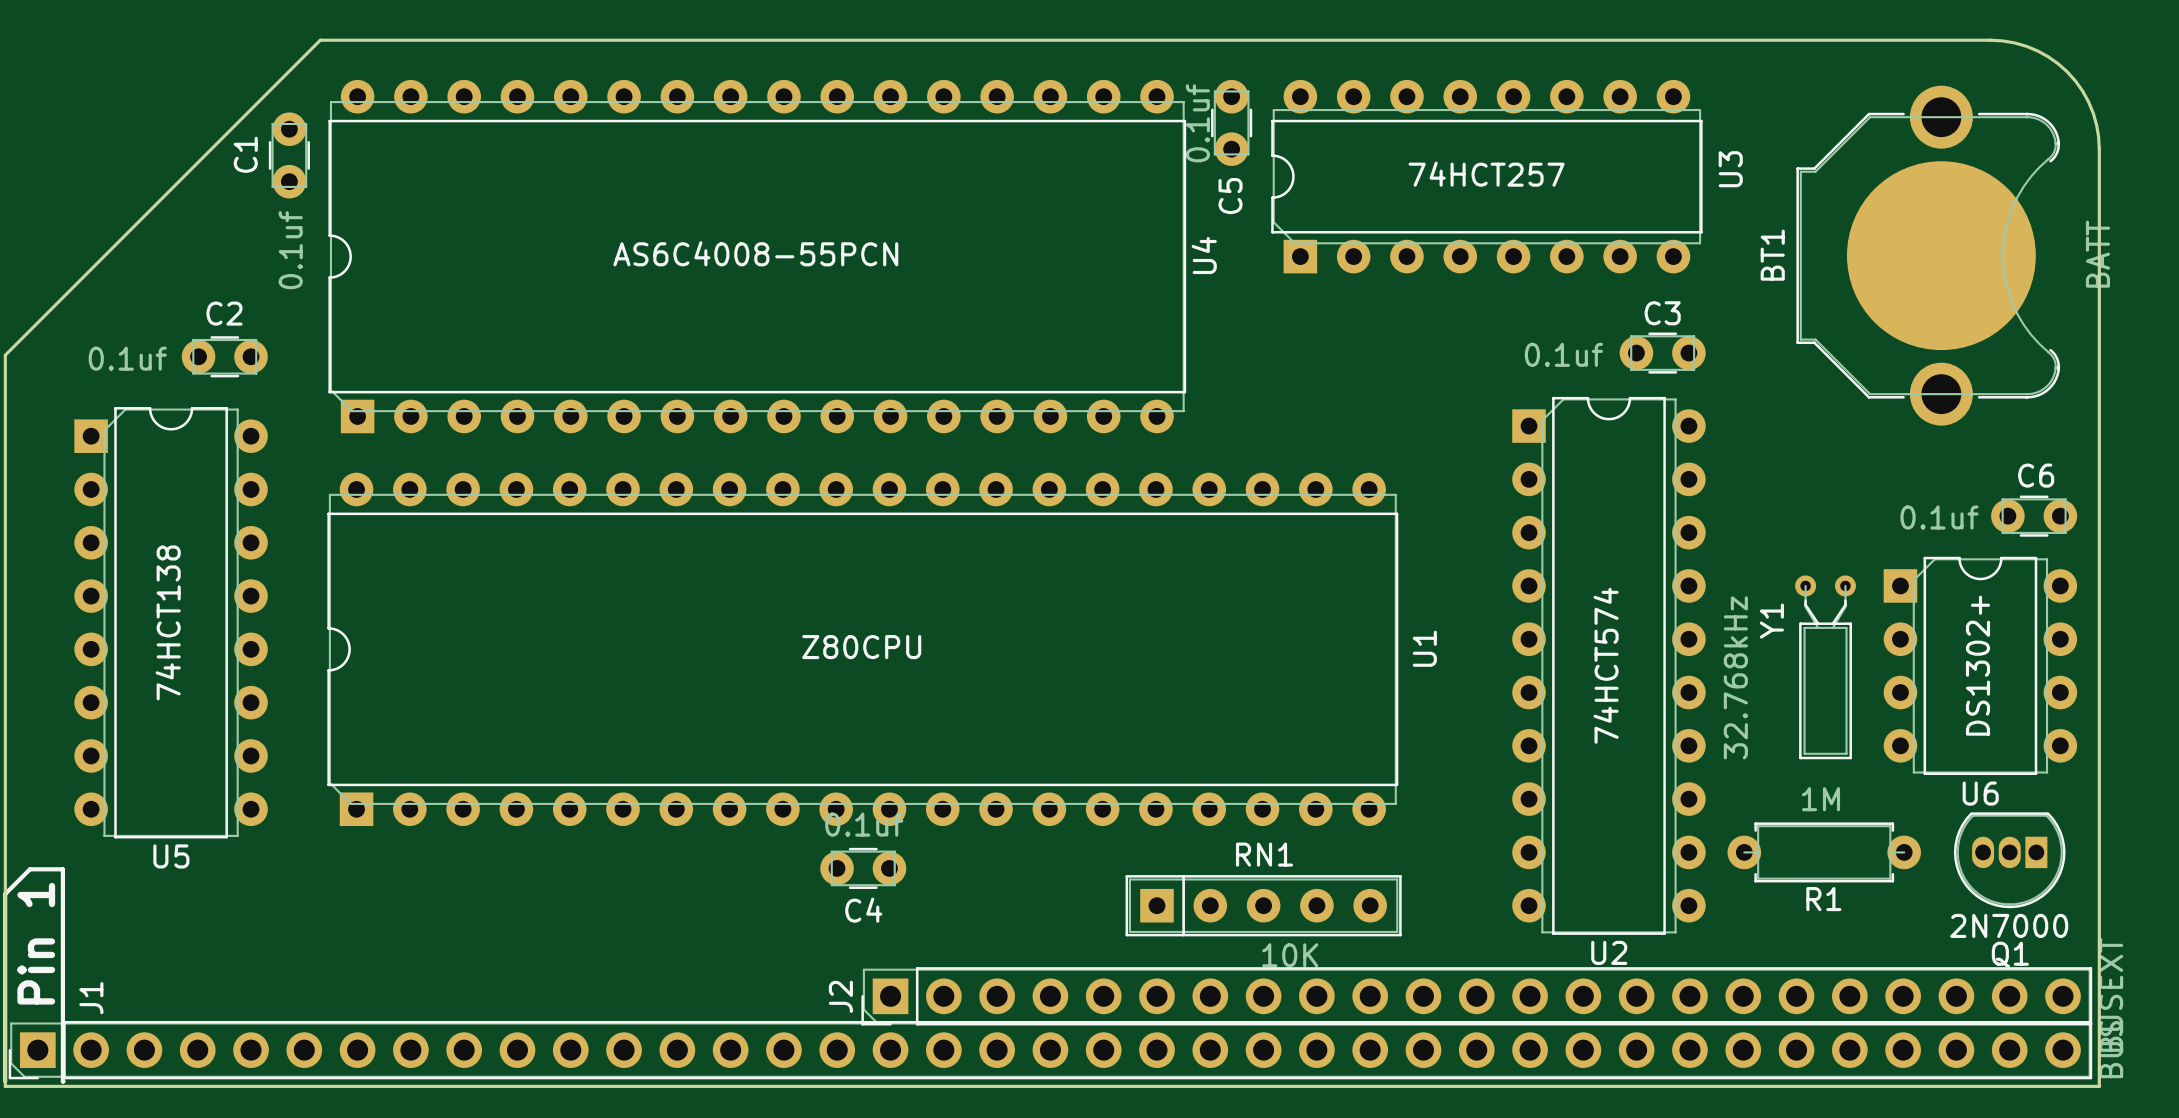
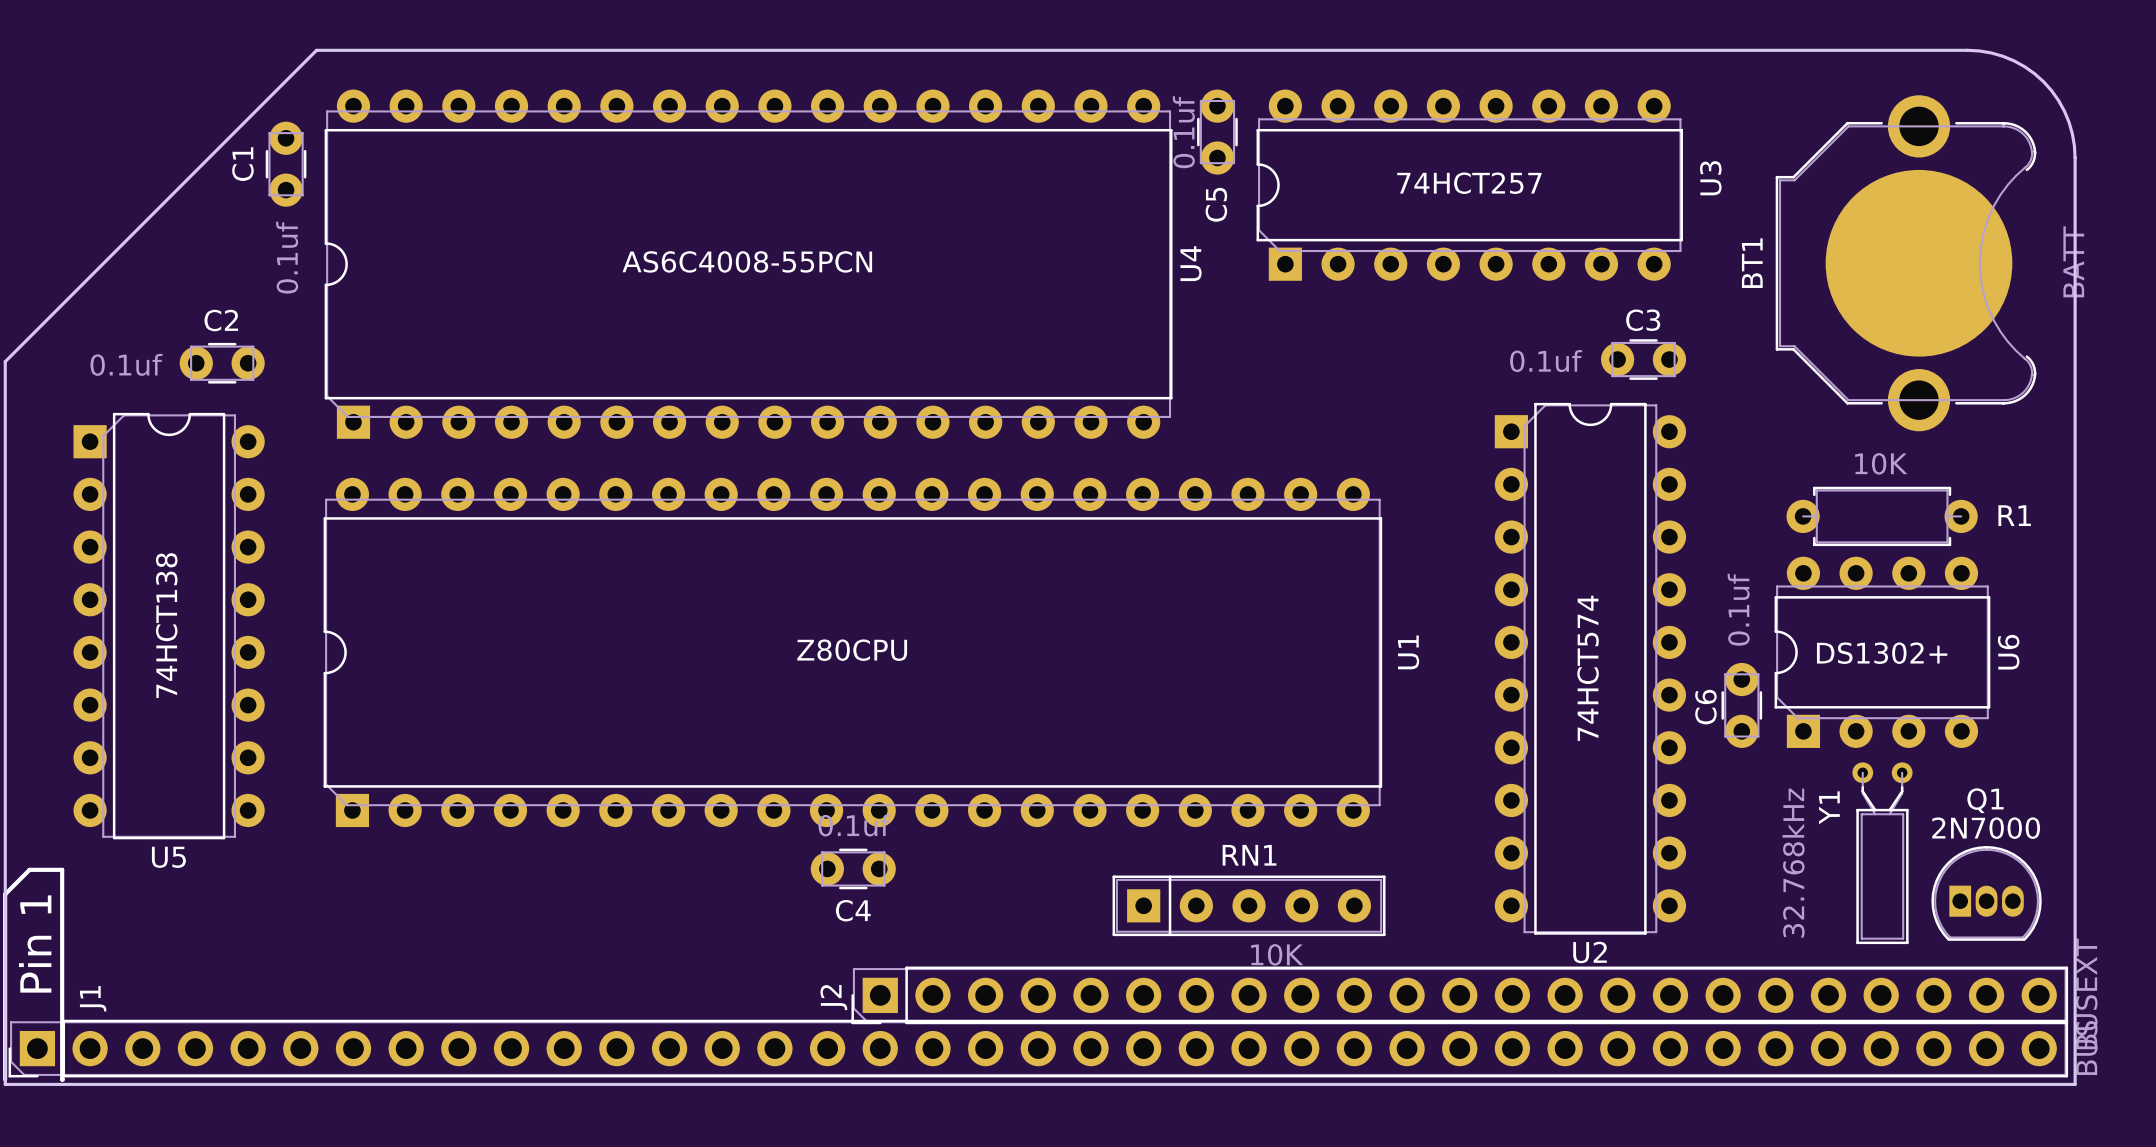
C6 name position: C6 (2036, 475) -> C6 (1705, 707)
C6 rotation: 0° (2034, 516) -> 90° clockwise (1741, 705)
C6 position: (2034, 516) -> (1741, 705)
U6 rotation: 0° (1980, 665) -> 90° counterclockwise (1882, 652)
Y1 position: (1825, 667) -> (1882, 853)
R1 value: 1M (1820, 799) -> 10K (1881, 463)
R1 position: (1824, 852) -> (1882, 516)
Q1 rotation: 0° (2009, 860) -> 180° (1986, 893)
R1 name position: R1 (1823, 899) -> R1 (2014, 515)

